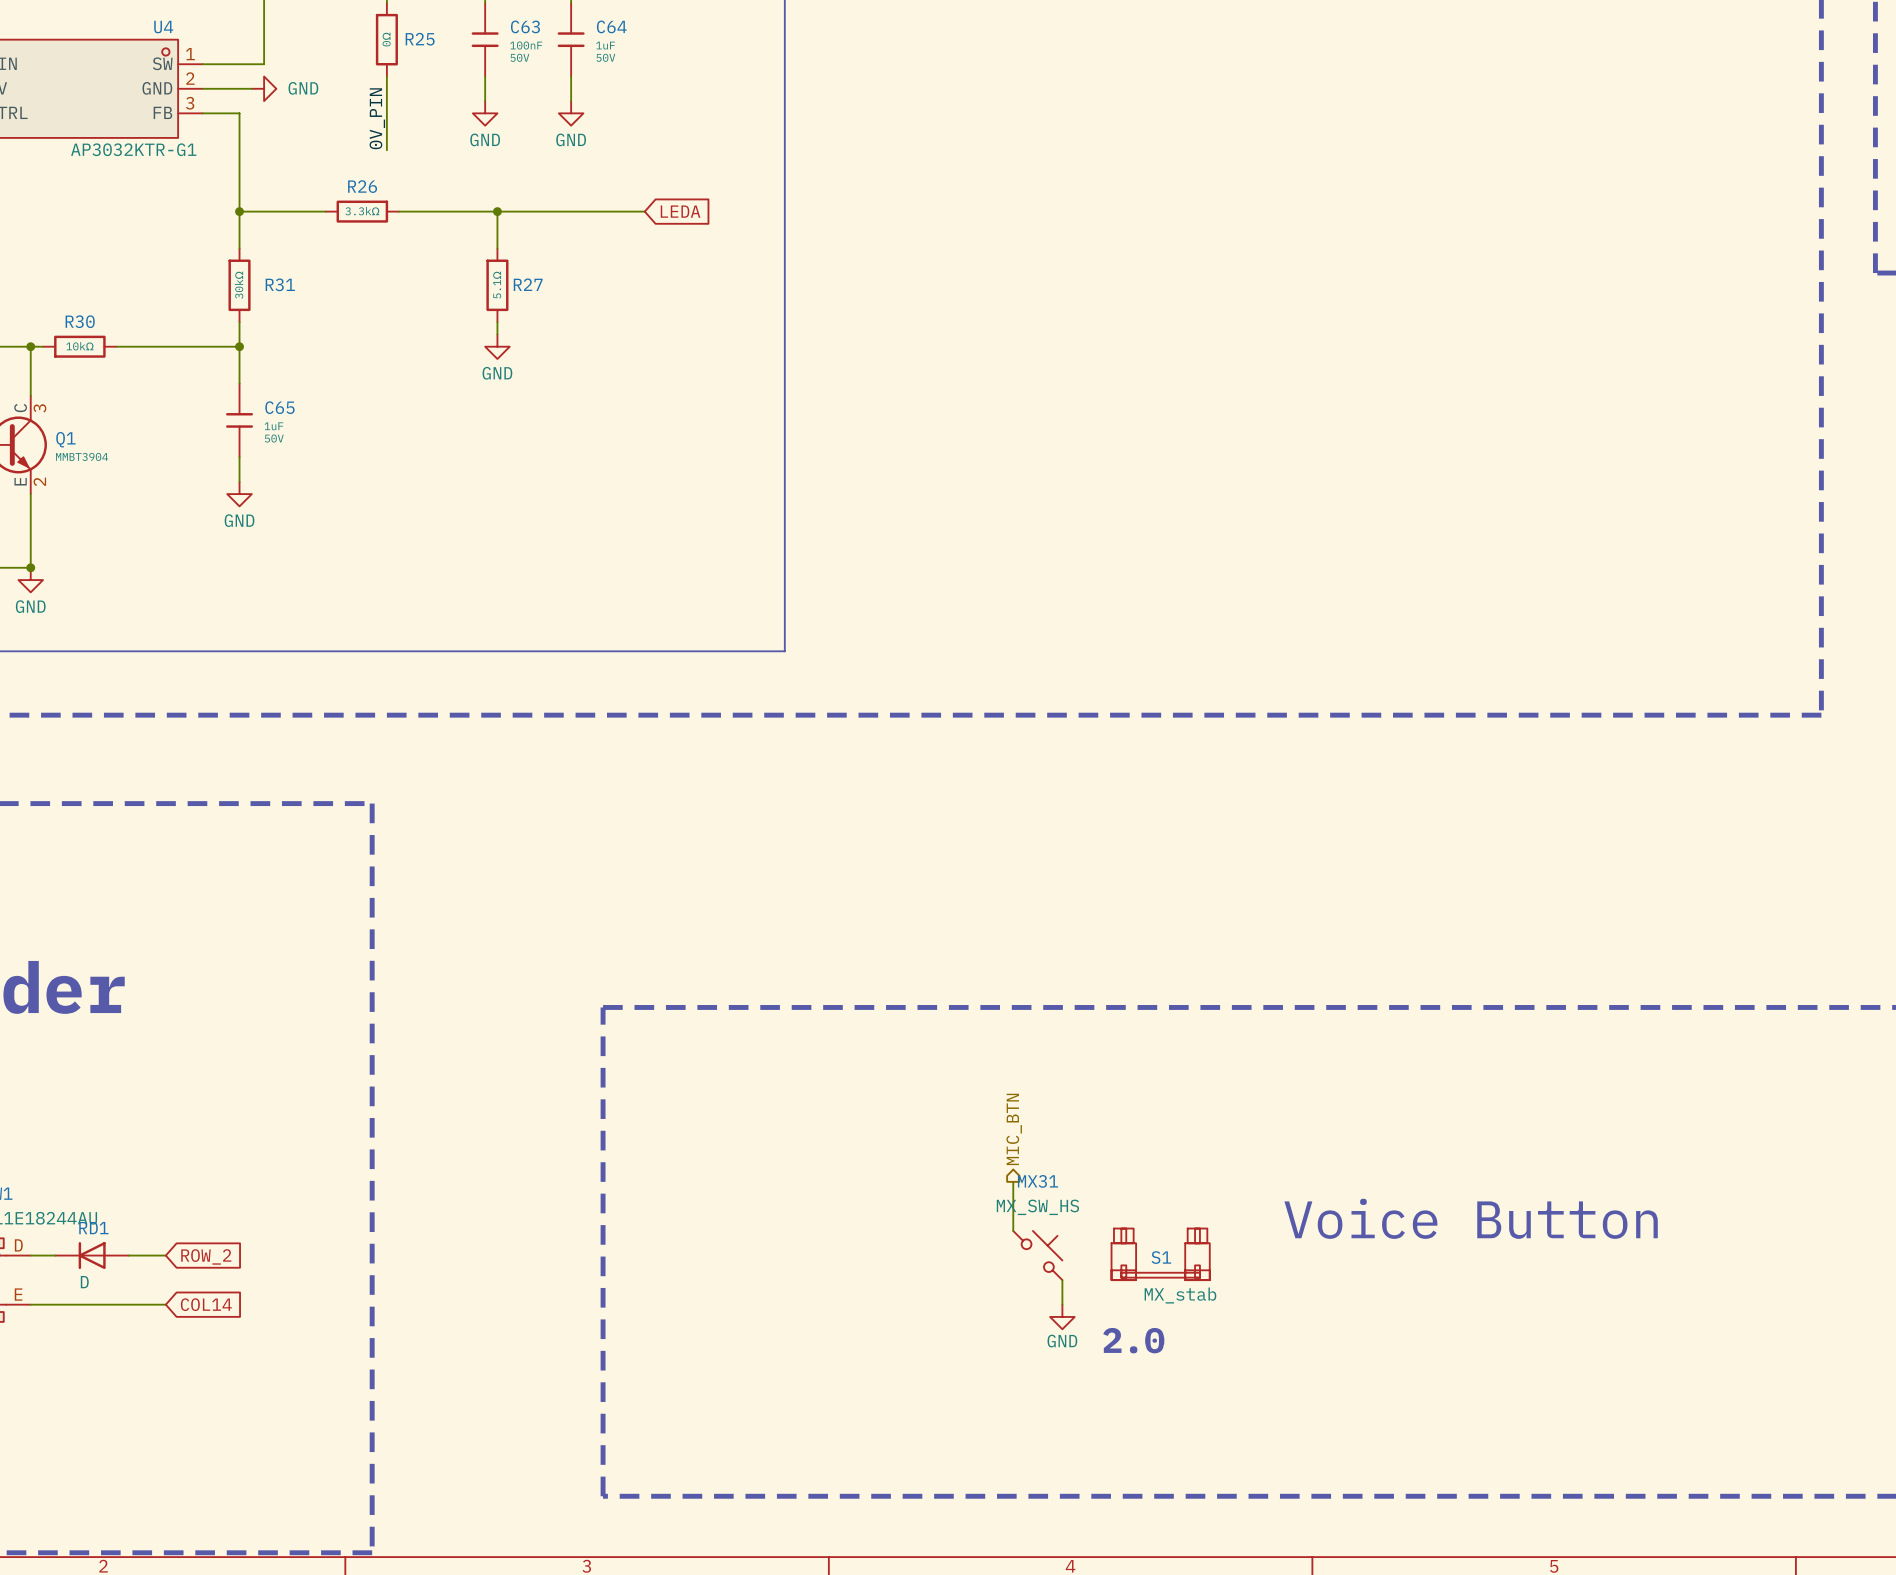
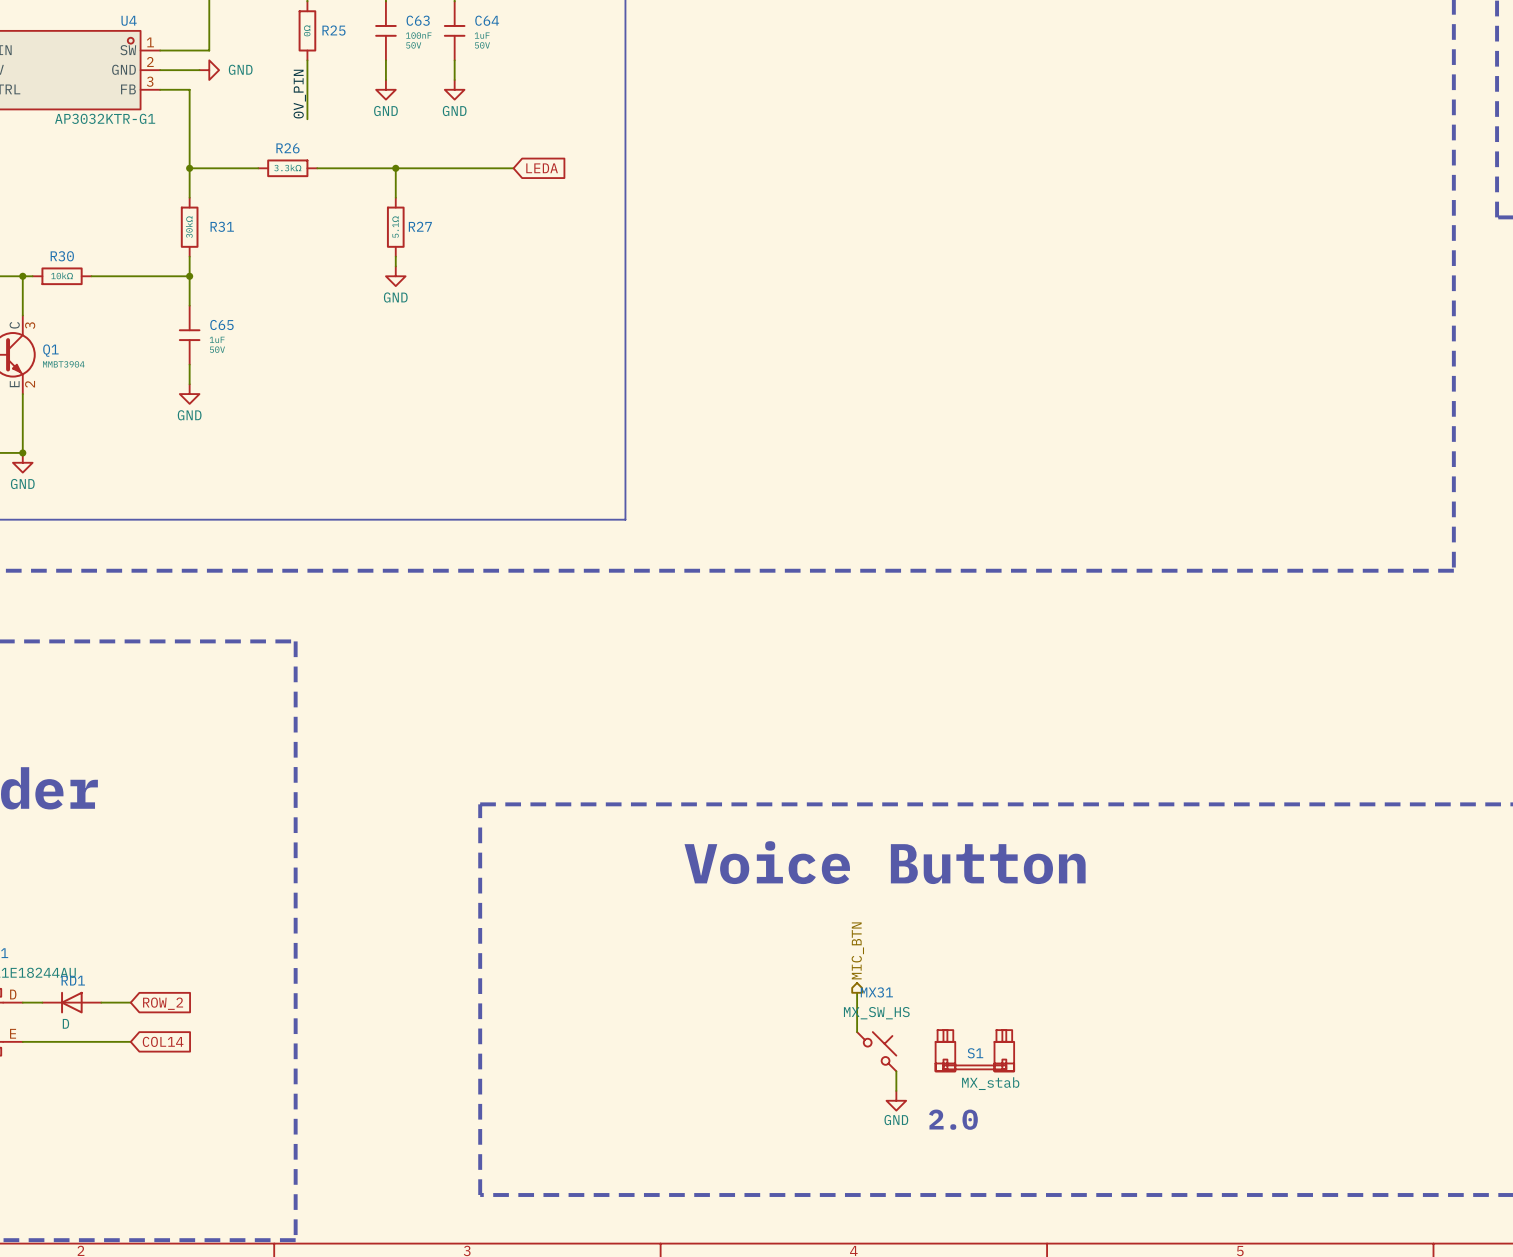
text: none -> Voice Button (885, 862)
hierarchical label position: MIC_BTN (1014, 1129) -> MIC_BTN (857, 950)
wire: (1013, 1181) (1013, 1230) -> (857, 992) (857, 1032)
text: Voice Button (1471, 1218) -> none
S1 position: (1160, 1254) -> (974, 1050)
MX31 position: (1037, 1255) -> (876, 1051)
wire: (1062, 1280) (1062, 1304) -> (896, 1071) (896, 1090)
power symbol position: GND (1062, 1316) -> GND (896, 1100)
text position: 2.0 (1133, 1340) -> 2.0 (953, 1119)

